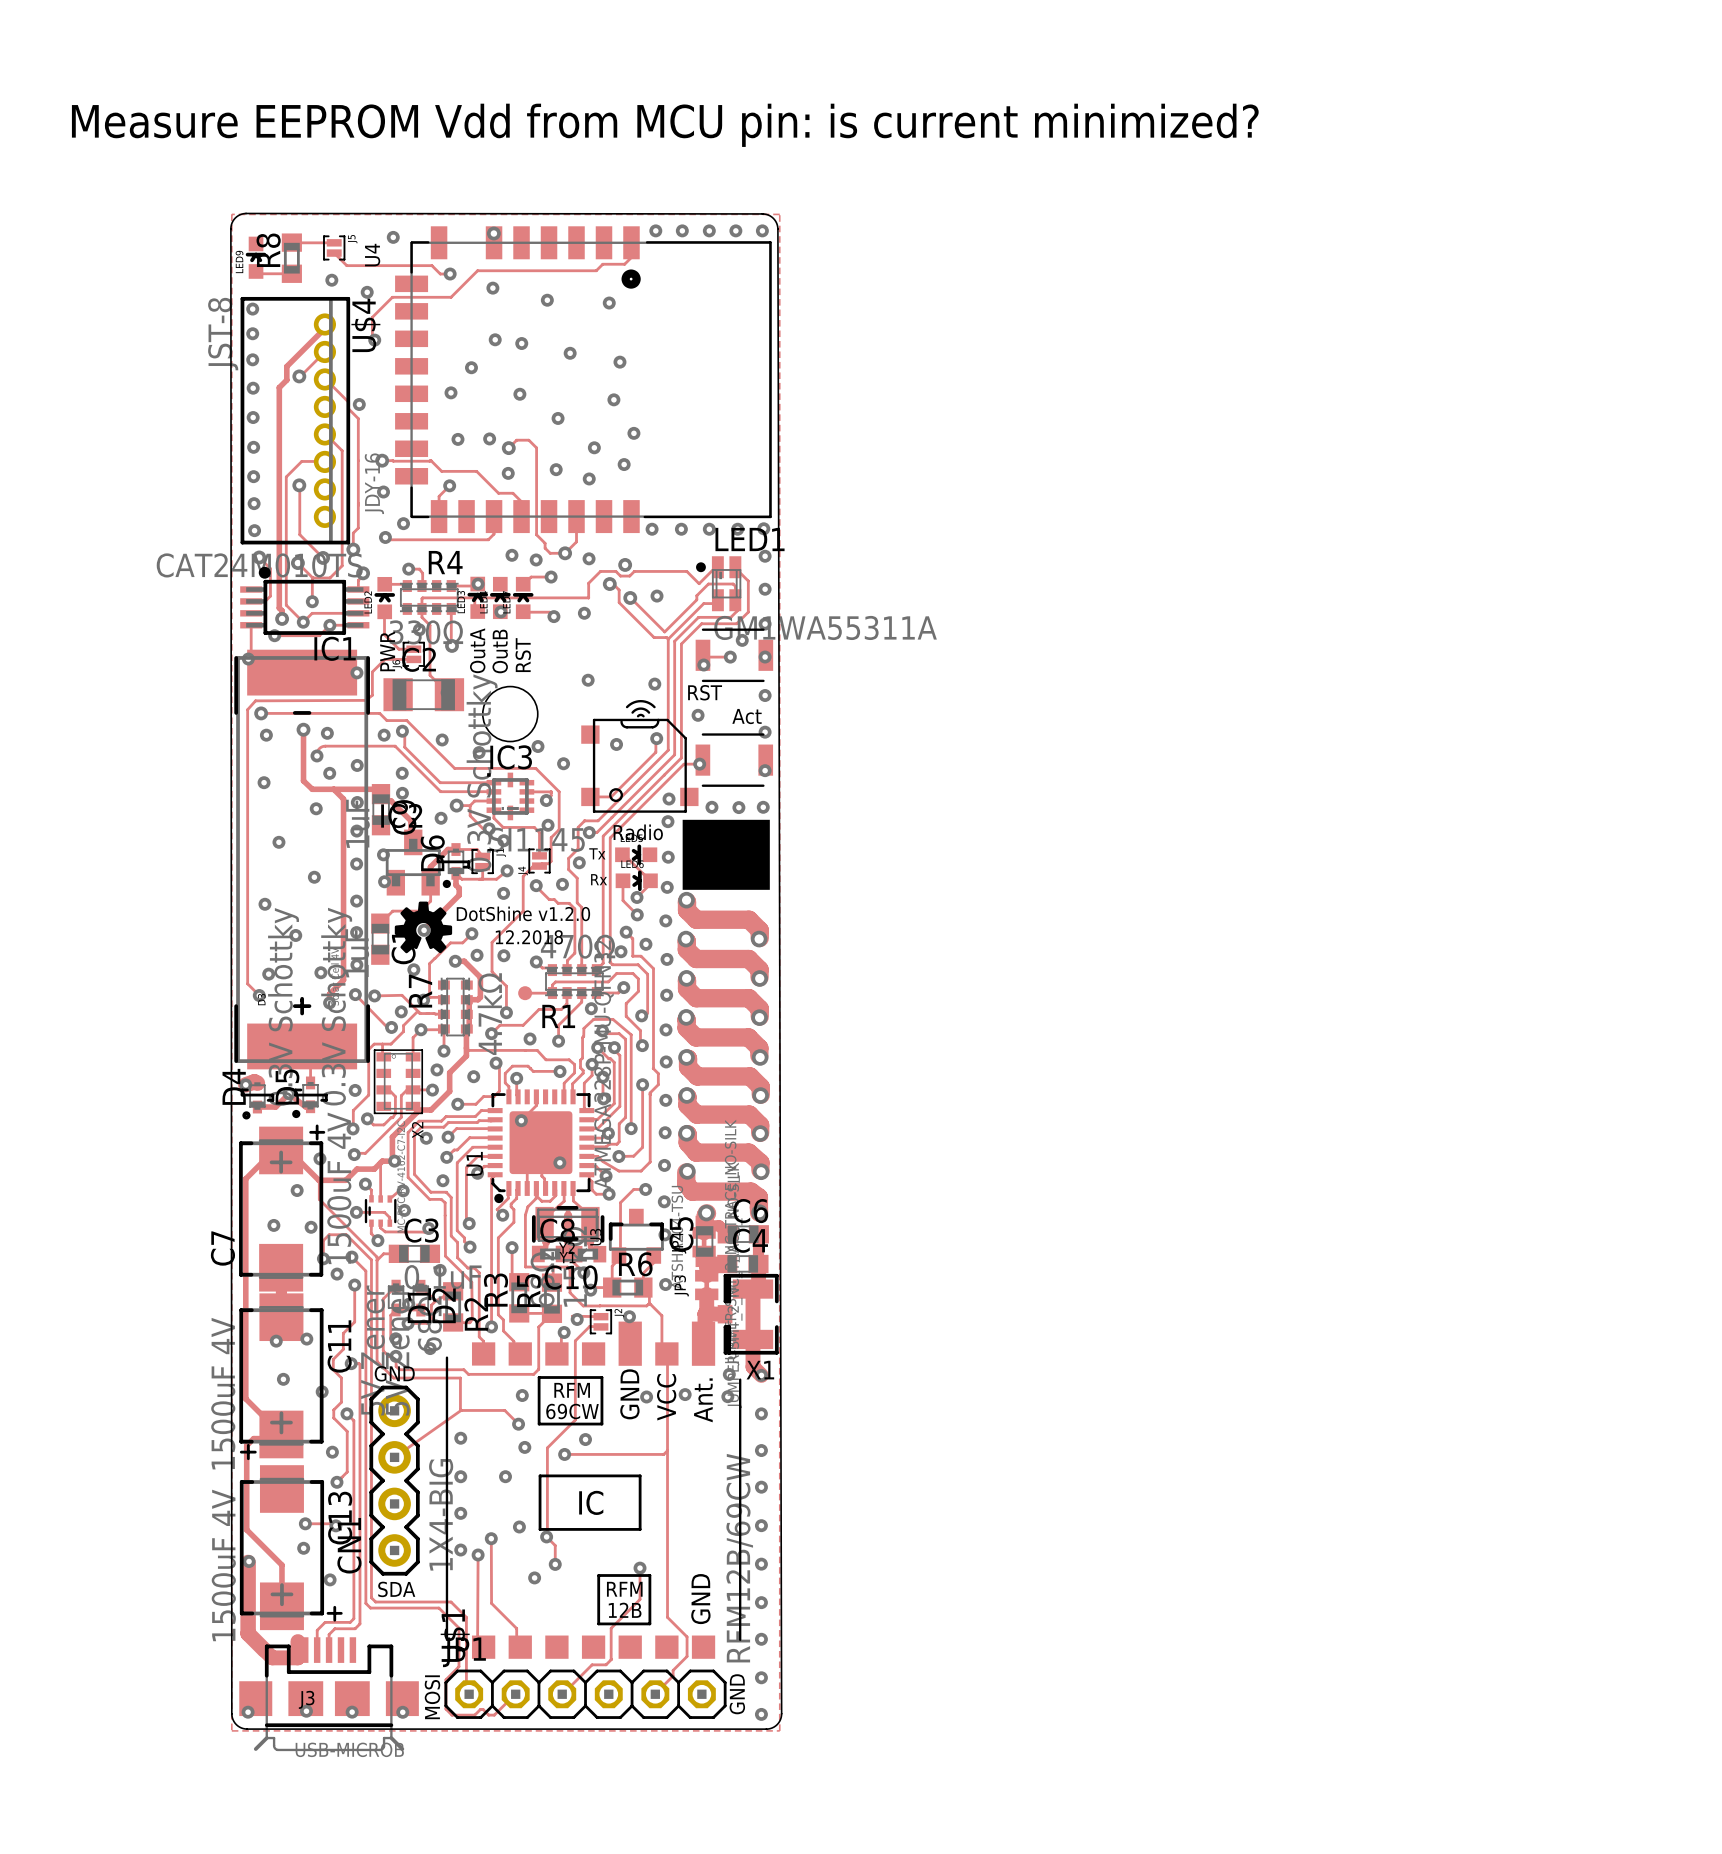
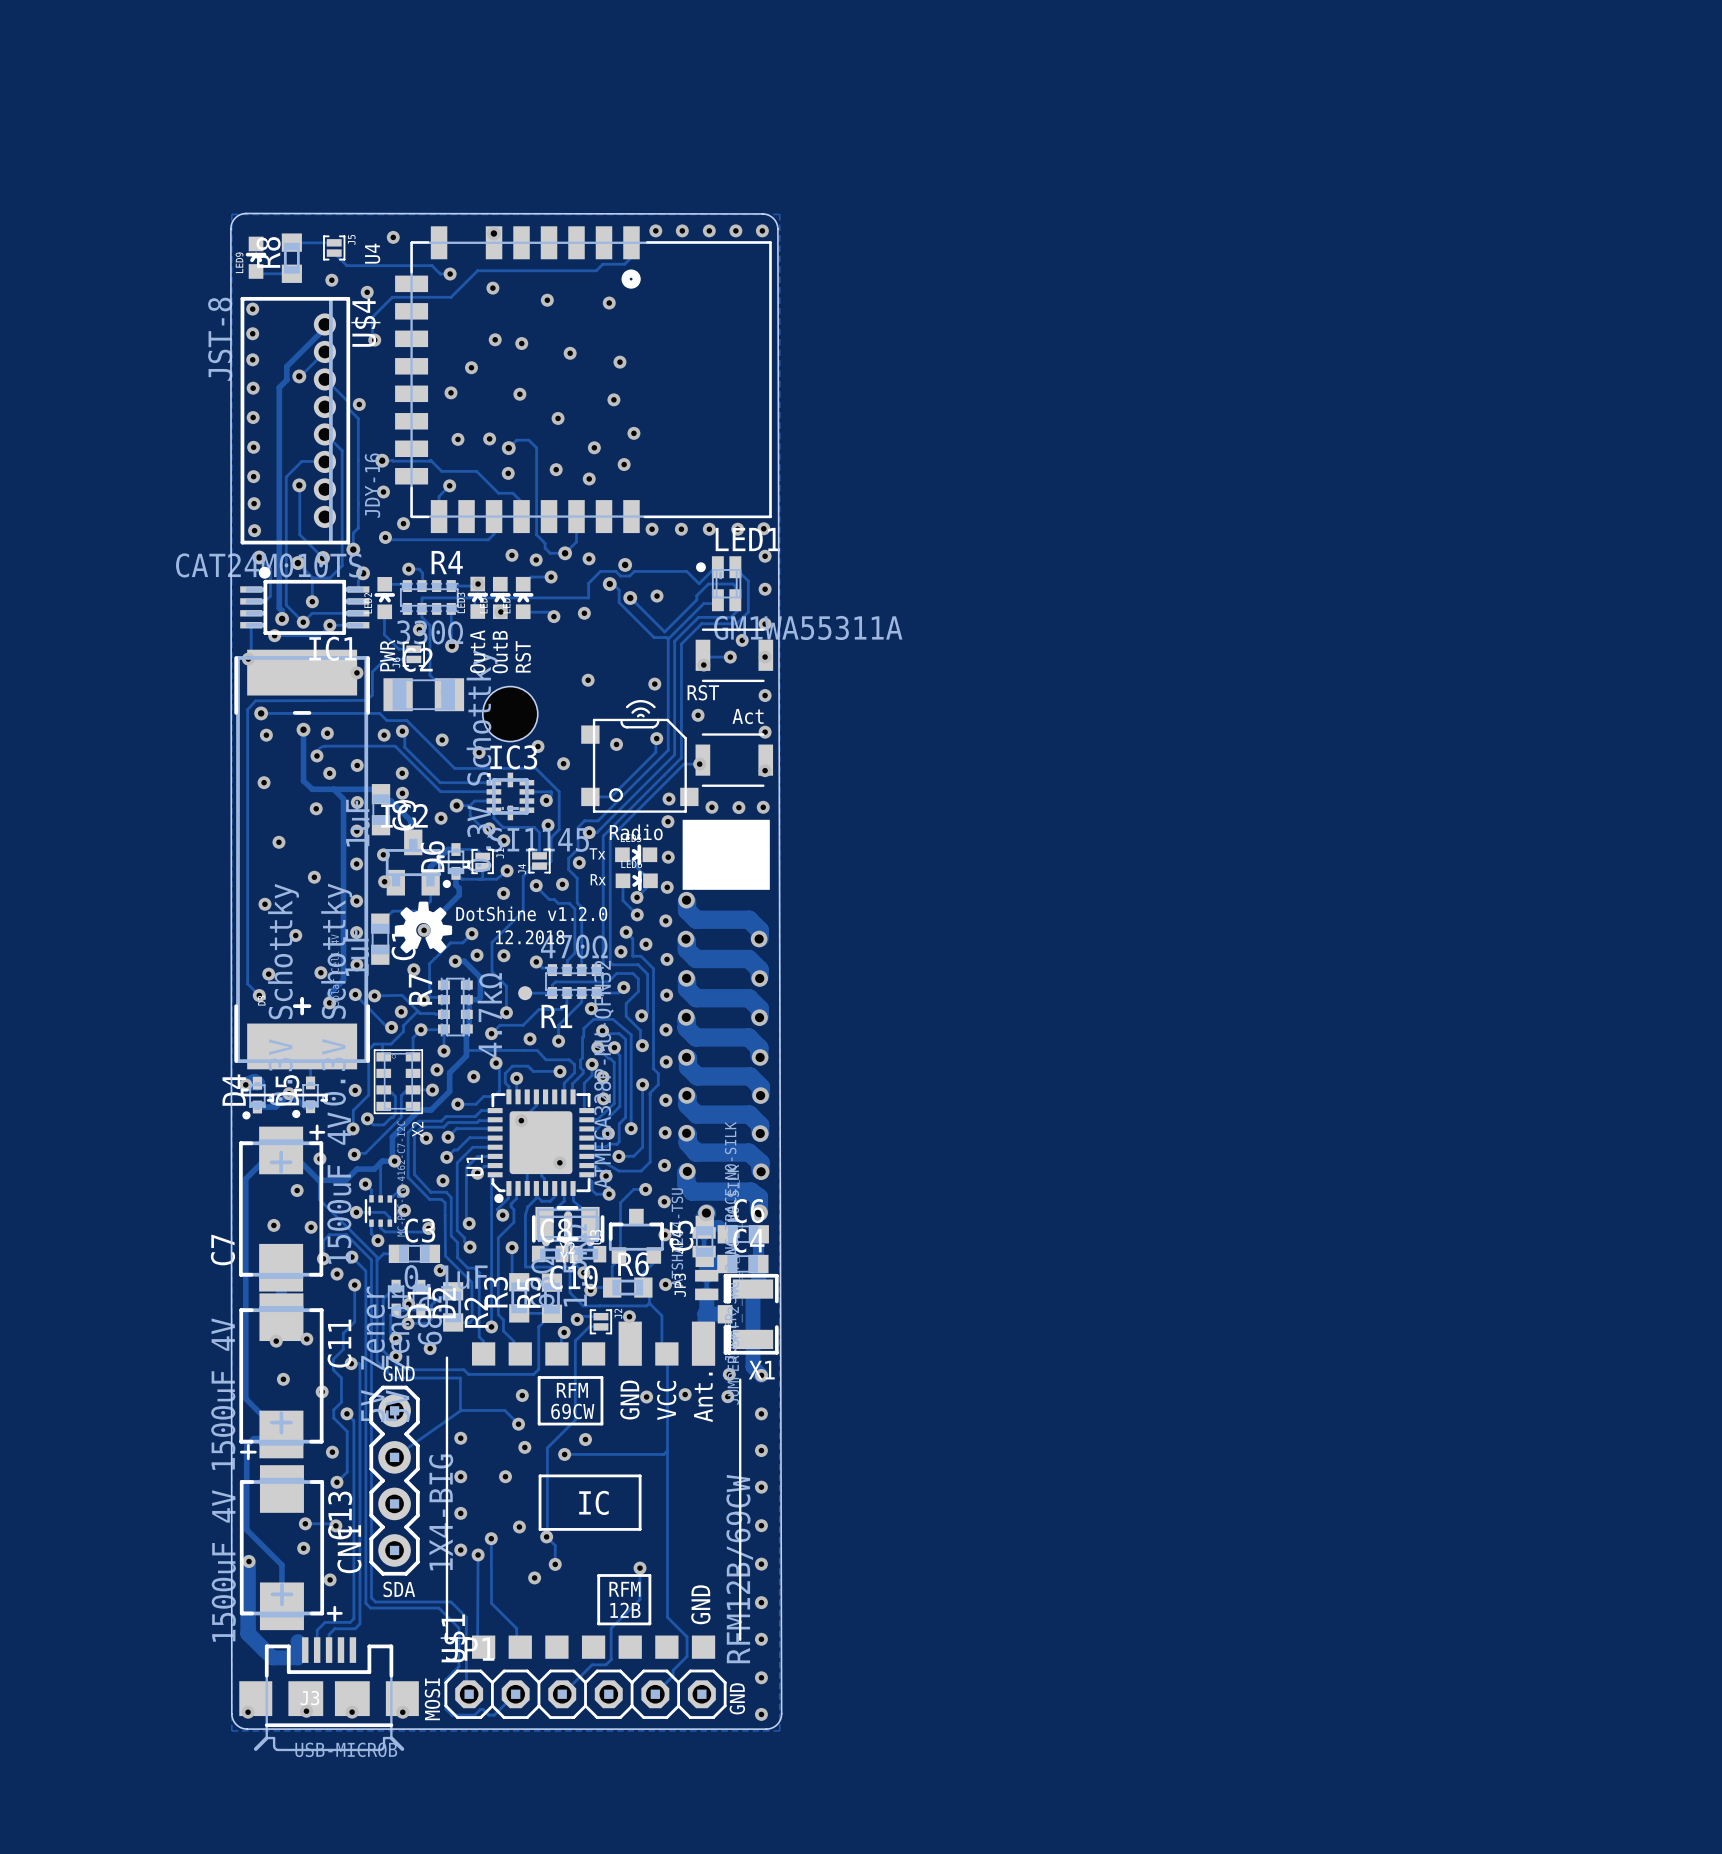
text: Measure EEPROM Vdd from MCU pin: is current minimized? (665, 125) -> none

